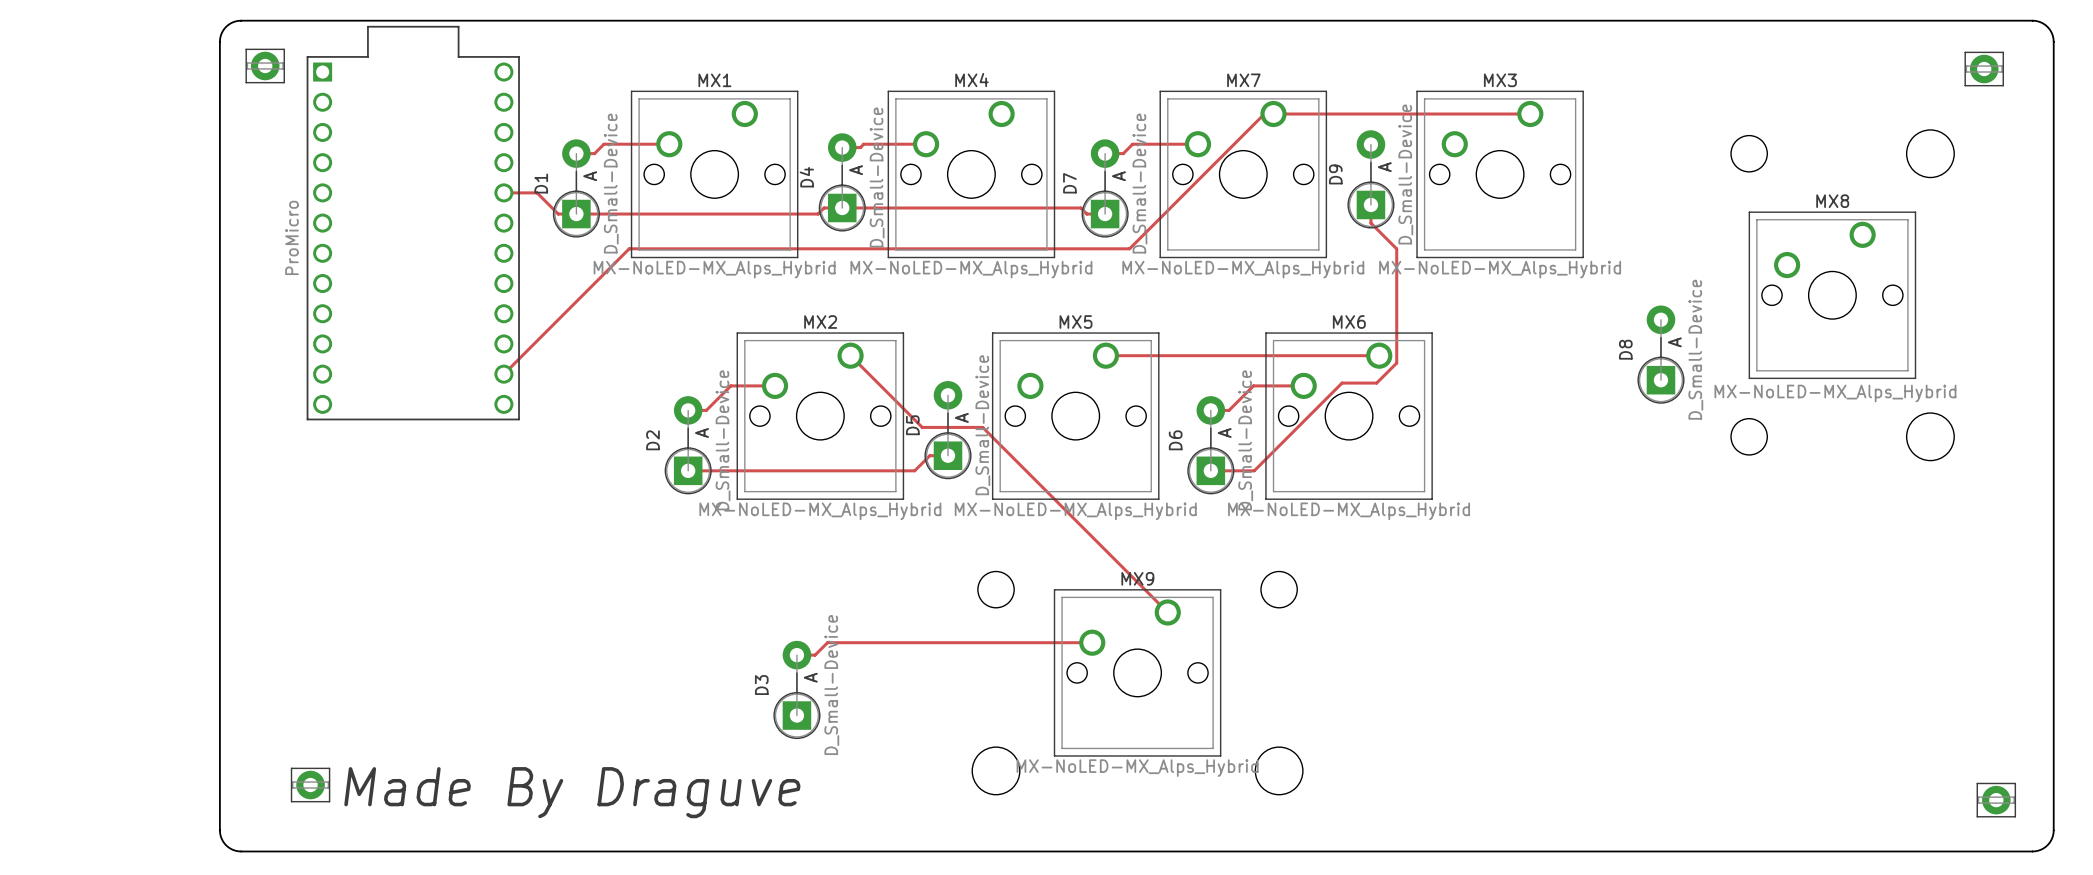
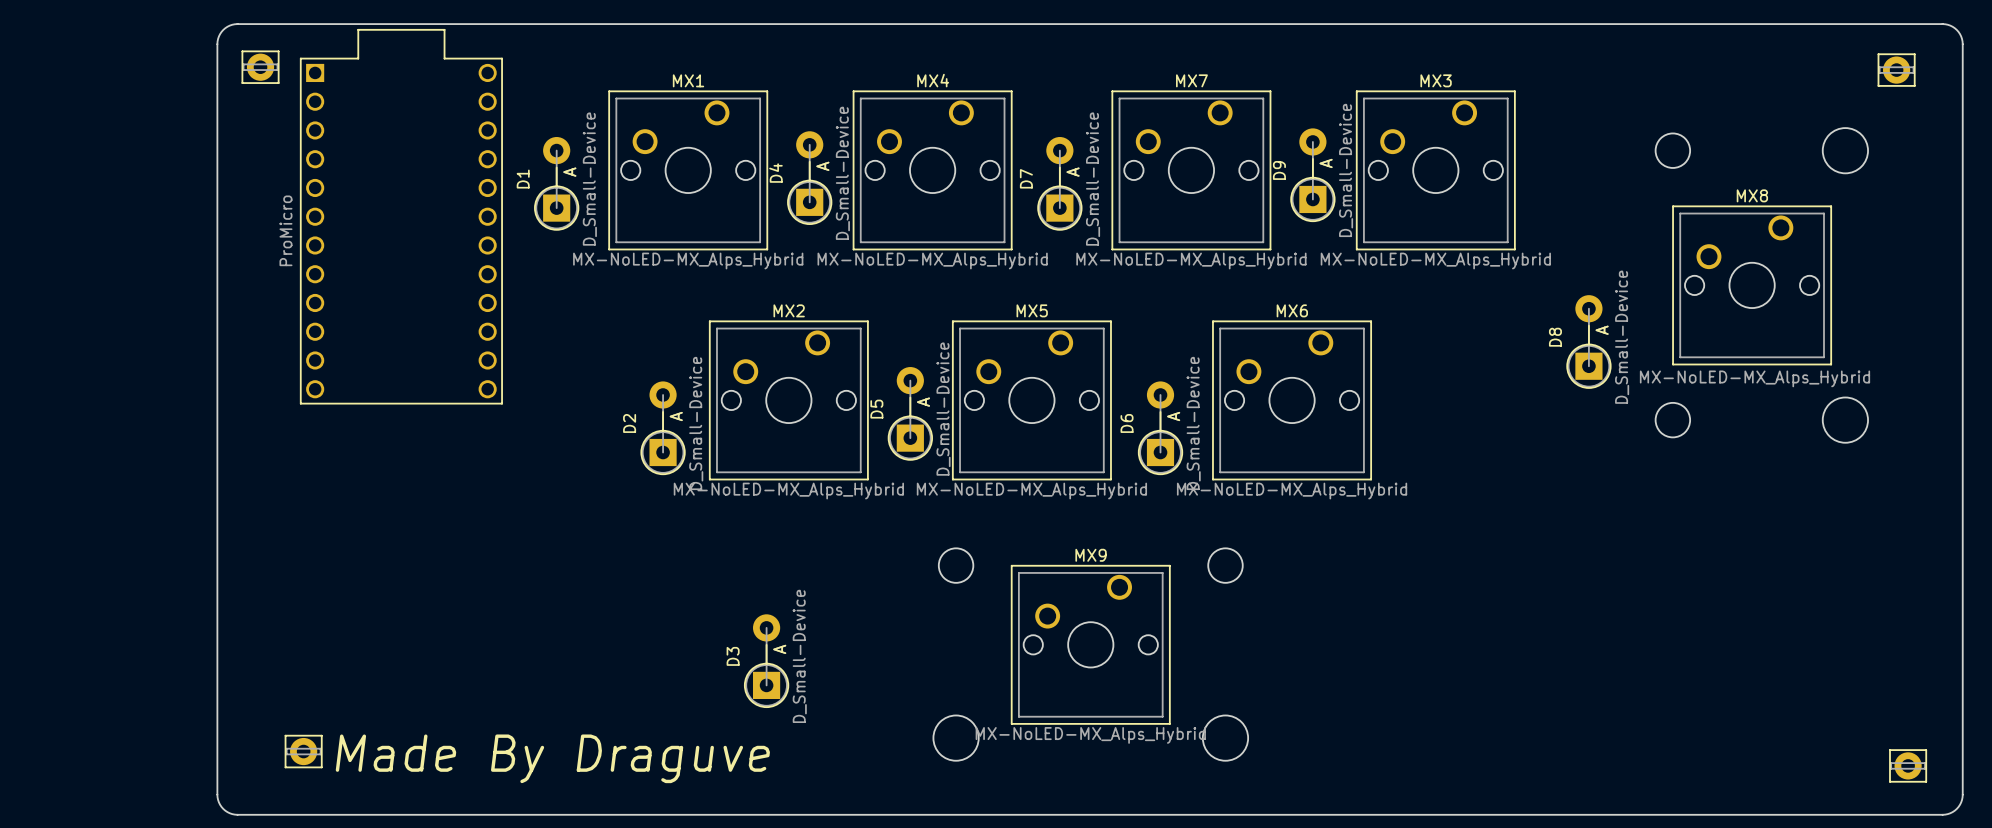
track: (1530, 114) (1264, 114) (1129, 248) (629, 248) (503, 374) -> none
track: (669, 144) (603, 144) (594, 153) (576, 153) -> none
track: (926, 144) (863, 144) (860, 147) (842, 147) -> none
track: (1197, 144) (1132, 144) (1123, 153) (1105, 153) -> none
track: (503, 192) (537, 192) (558, 214) (818, 214) (824, 207) (1080, 207) (1086, 214) (1105, 214) -> none
track: (1370, 204) (1370, 223) (1396, 248) (1396, 363) (1376, 383) (1342, 383) (1254, 470) (1210, 470) -> none
track: (850, 355) (922, 427) (982, 427) (1167, 612) -> none
track: (1105, 355) (1379, 355) -> none
track: (775, 385) (730, 385) (706, 410) (688, 410) -> none
track: (1303, 385) (1253, 385) (1229, 410) (1210, 410) -> none
track: (948, 455) (929, 455) (914, 470) (688, 470) -> none
track: (1092, 642) (827, 642) (815, 655) (796, 655) -> none

